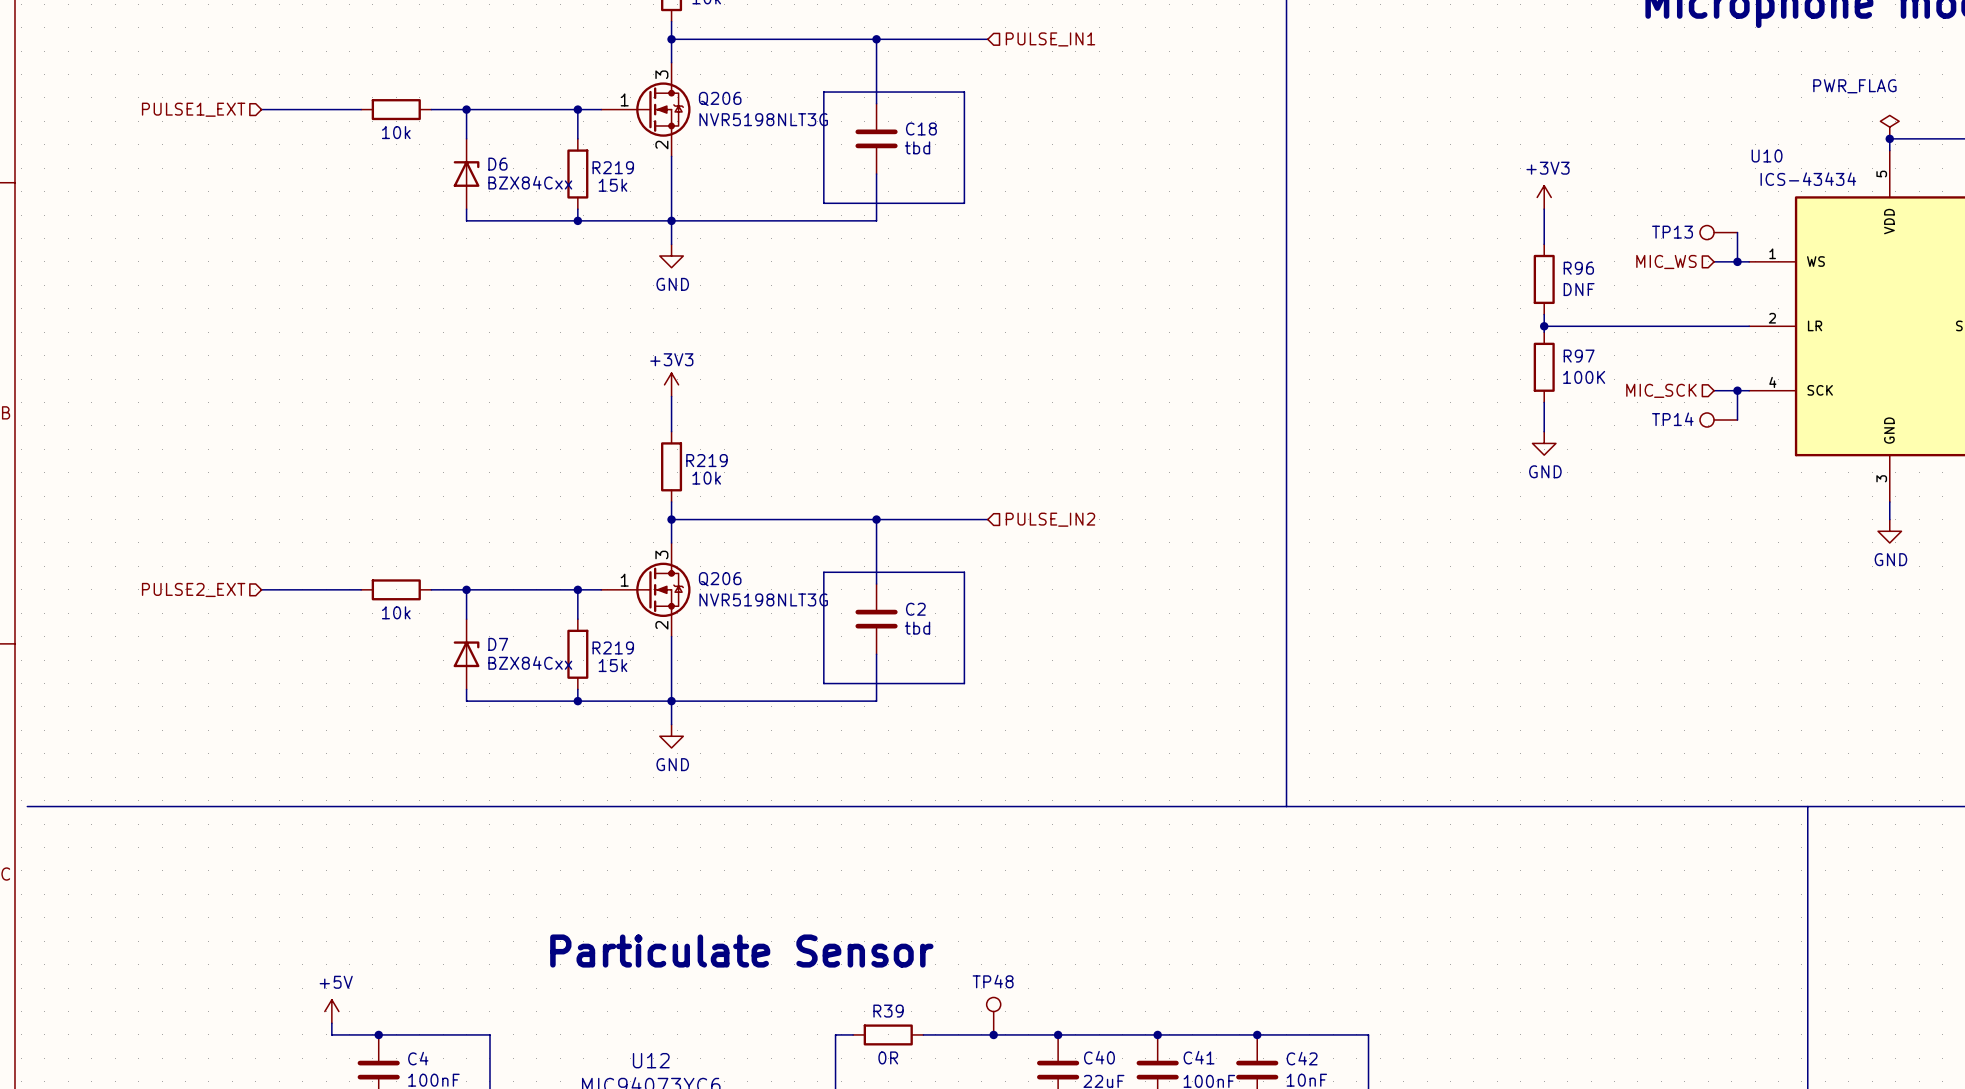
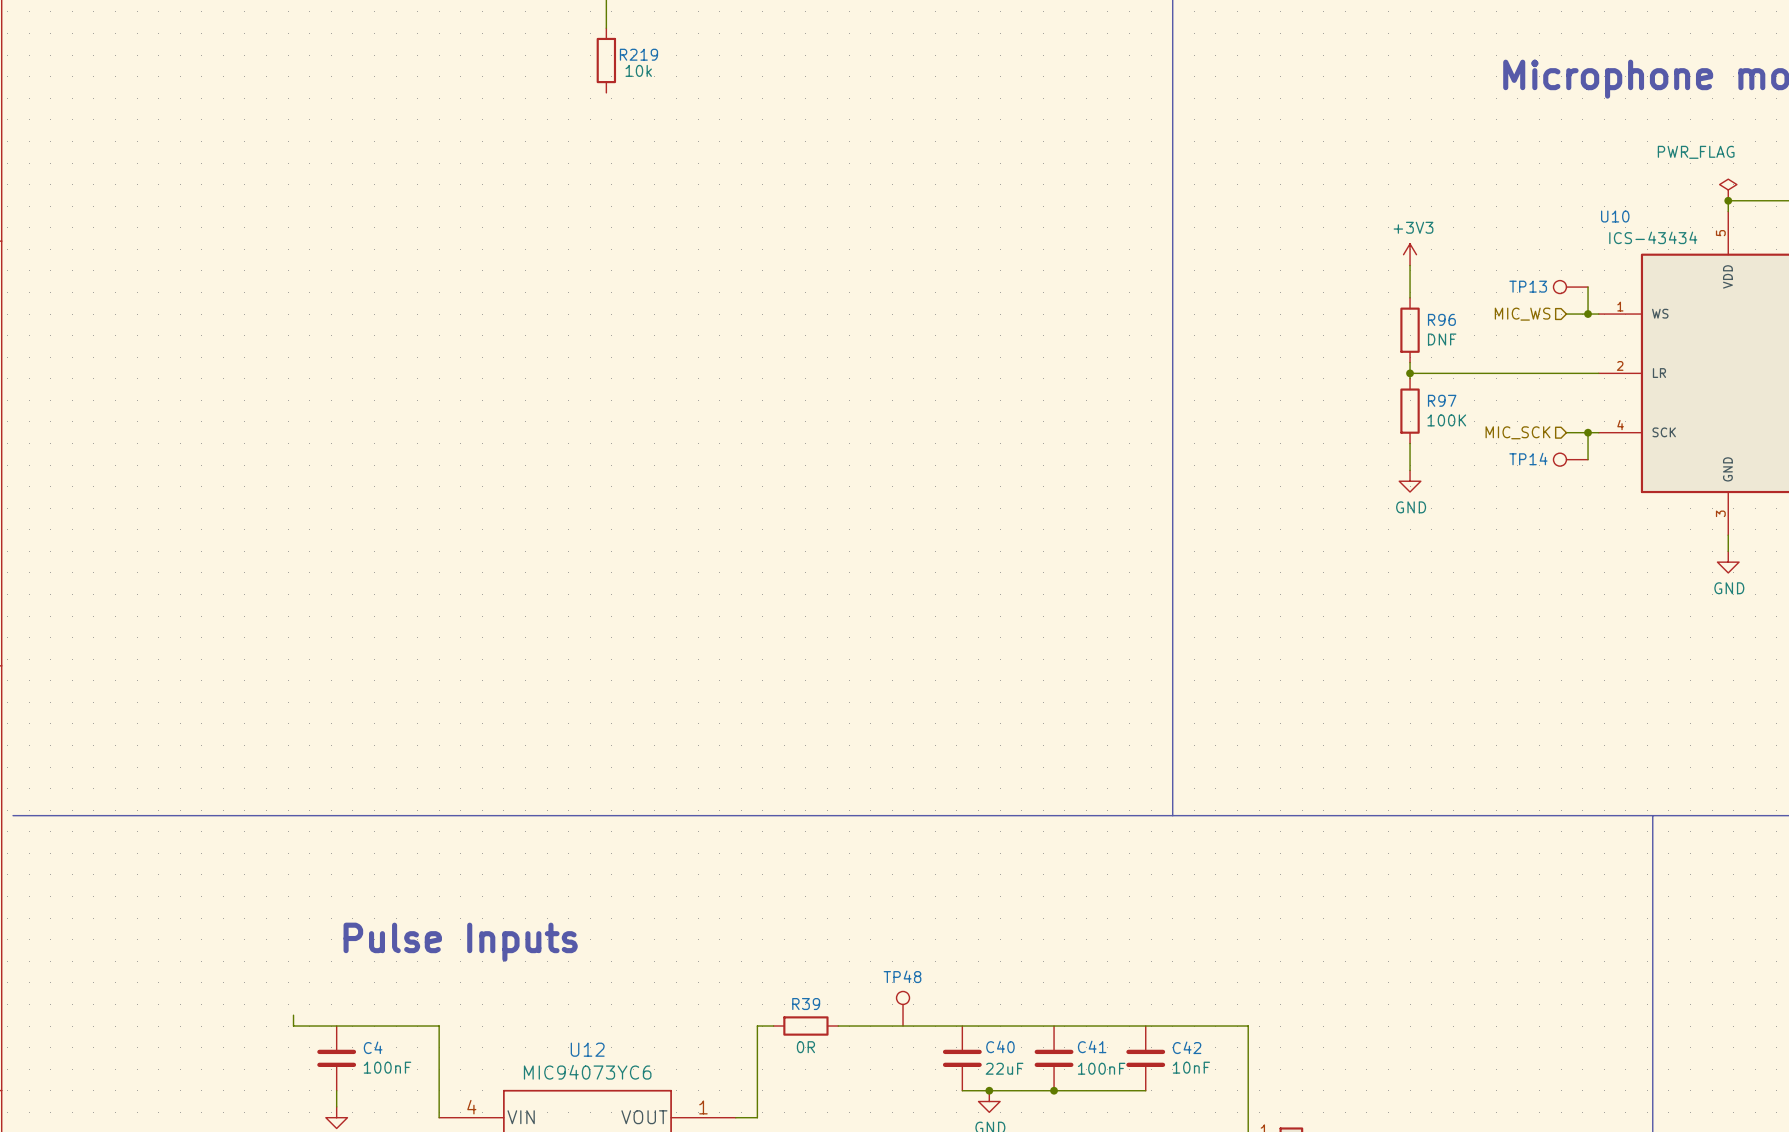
wire: (671, 21) (671, 62) -> none
wire: (671, 39) (987, 39) -> none
junction: (671, 39) -> none
wire: (876, 39) (876, 103) -> none
junction: (876, 39) -> none
hierarchical label: PULSE_IN1 (1050, 39) -> none
line: (823, 92) (823, 203) (964, 203) (964, 92) (823, 92) -> none
hierarchical label: PULSE1_EXT (193, 109) -> none
wire: (261, 109) (361, 109) -> none
part: 10k (396, 109) -> none
wire: (431, 109) (601, 109) -> none
wire: (466, 109) (466, 138) -> none
junction: (466, 109) -> none
wire: (577, 109) (577, 138) -> none
junction: (577, 109) -> none
Q206: NVR5198NLT3G (645, 109) -> none
C18: tbd (876, 138) -> none
wire: (671, 156) (671, 244) -> none
D6: BZX84Cxx (466, 174) -> none
R219: 15k (577, 174) -> none
wire: (876, 174) (876, 220) (466, 220) (466, 209) -> none
wire: (577, 209) (577, 220) -> none
junction: (577, 220) -> none
junction: (671, 220) -> none
power symbol: GND (671, 256) -> none
power symbol: +3V3 (671, 384) -> none
wire: (671, 396) (671, 431) -> none
R219: 10k (671, 466) -> none
wire: (671, 501) (671, 542) -> none
wire: (671, 519) (987, 519) -> none
junction: (671, 519) -> none
wire: (876, 519) (876, 583) -> none
junction: (876, 519) -> none
hierarchical label: PULSE_IN2 (1050, 519) -> none
line: (823, 572) (964, 572) (964, 683) (823, 683) (823, 572) -> none
hierarchical label: PULSE2_EXT (193, 589) -> none
wire: (261, 589) (361, 589) -> none
part: 10k (396, 589) -> none
wire: (431, 589) (601, 589) -> none
wire: (466, 589) (466, 619) -> none
junction: (466, 589) -> none
wire: (577, 589) (577, 619) -> none
junction: (577, 589) -> none
Q206: NVR5198NLT3G (645, 589) -> none
C2: tbd (876, 619) -> none
wire: (671, 636) (671, 724) -> none
D7: BZX84Cxx (466, 654) -> none
R219: 15k (577, 654) -> none
wire: (876, 654) (876, 701) (466, 701) (466, 689) -> none
wire: (577, 689) (577, 701) -> none
junction: (577, 701) -> none
junction: (671, 701) -> none
power symbol: GND (671, 736) -> none
text: none -> Pulse Inputs (460, 942)
text: Particulate Sensor (741, 951) -> none
power symbol: +5V (331, 1011) -> none
junction: (378, 1034) -> none
junction: (993, 1034) -> none
junction: (1058, 1034) -> none
junction: (1157, 1034) -> none
junction: (1257, 1034) -> none

